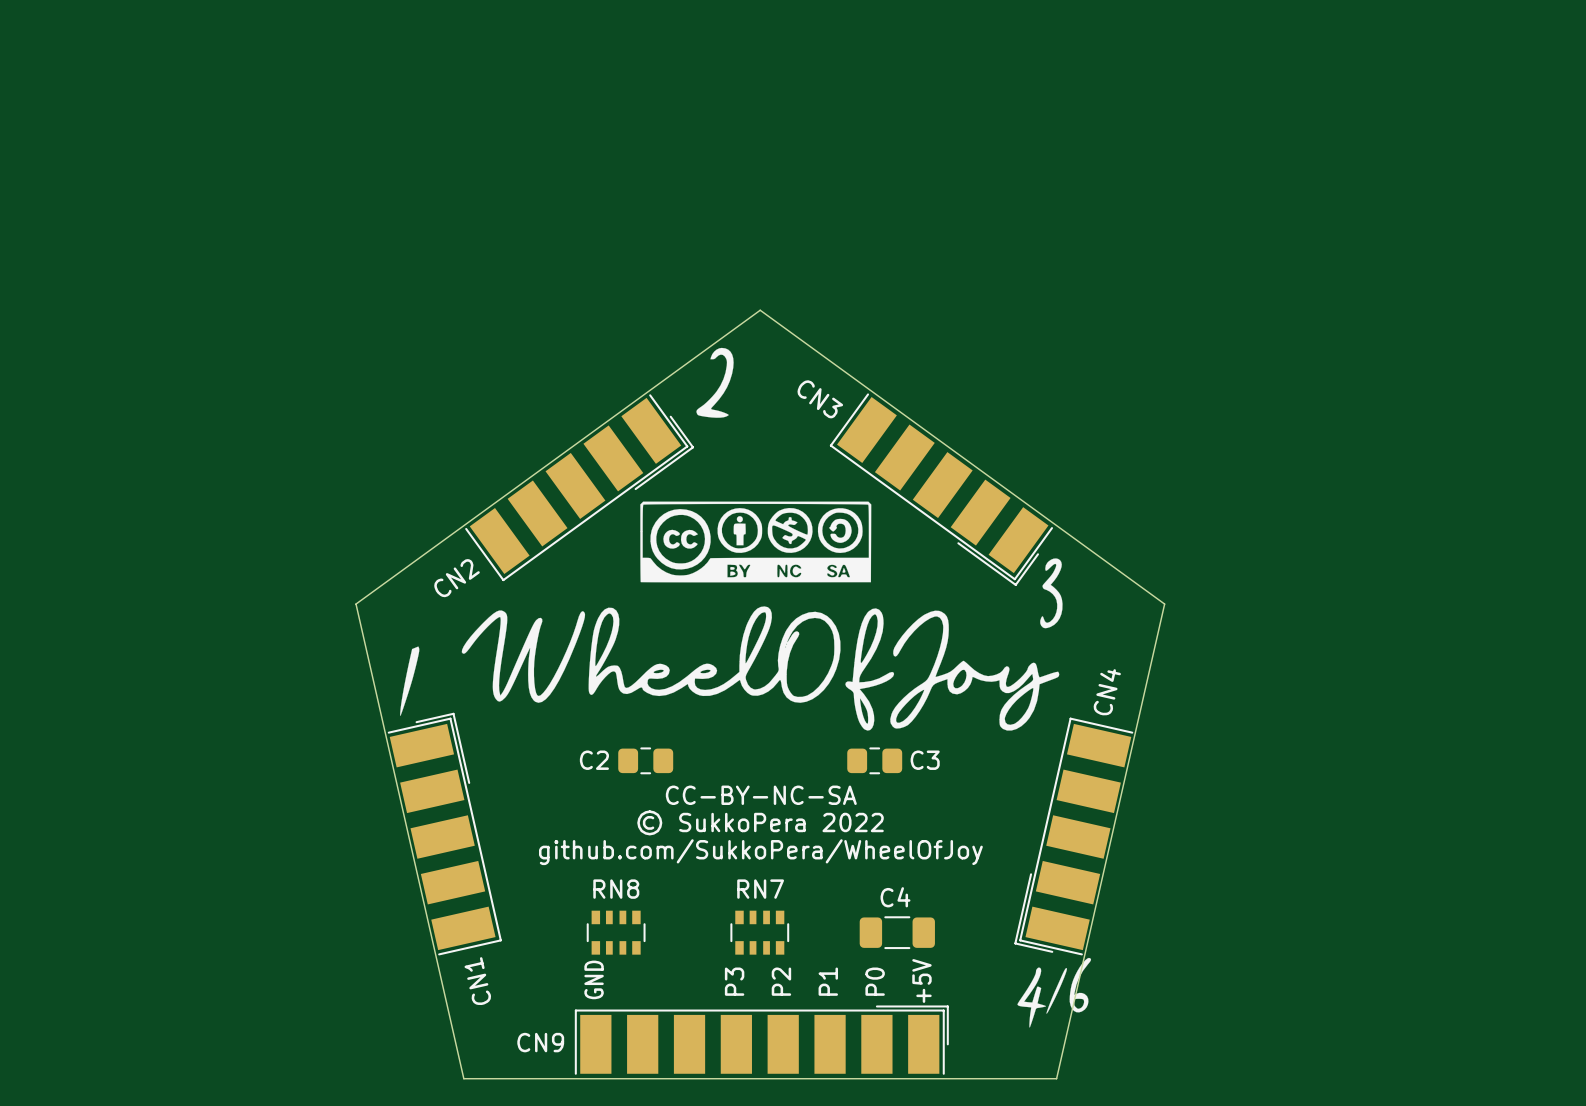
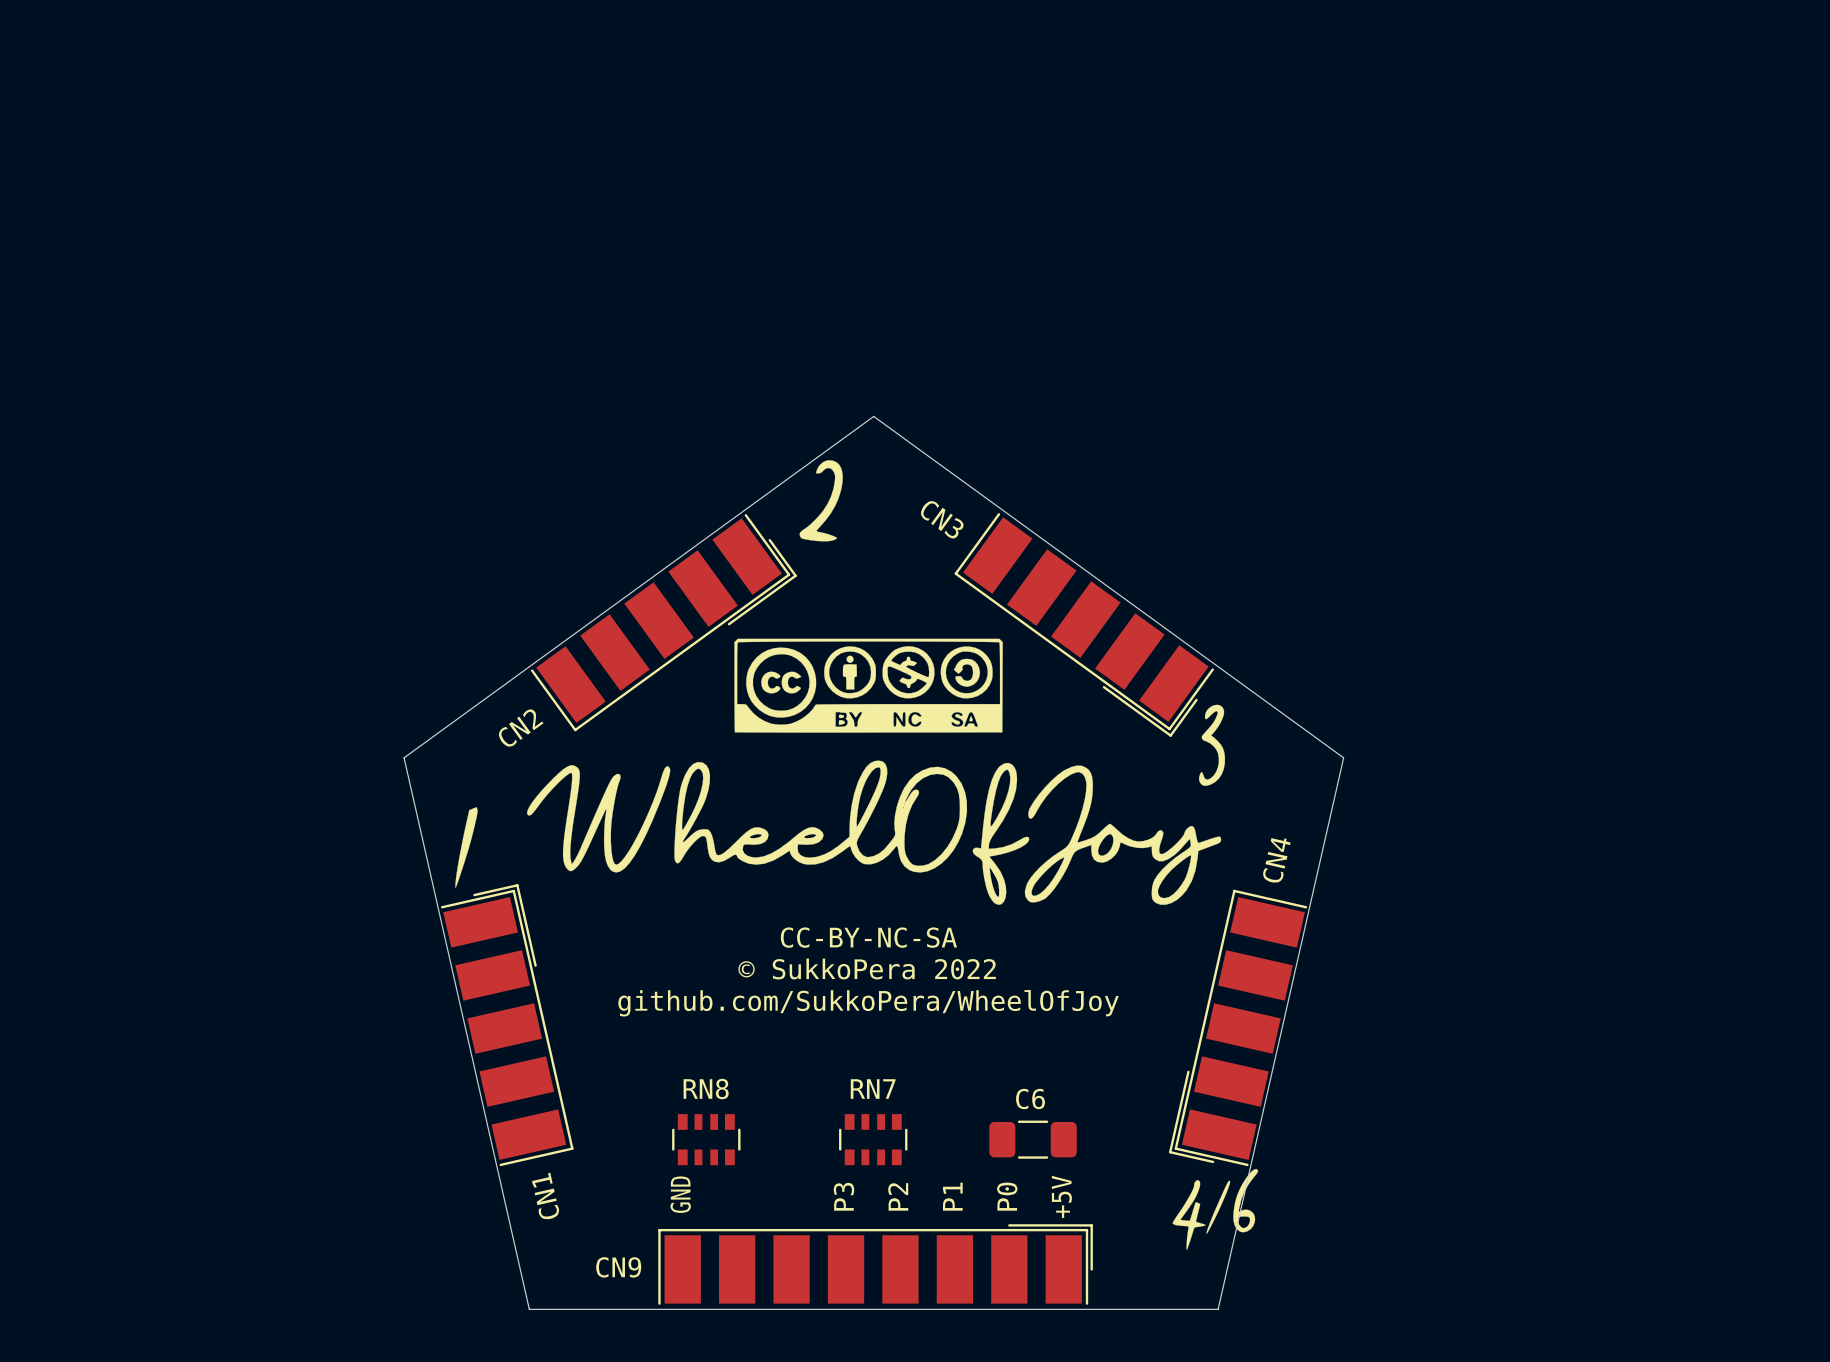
C2: (645, 760) -> none
C3: (874, 760) -> none
text position: CC-BY-NC-SA (761, 795) -> CC-BY-NC-SA (868, 937)
text position: © SukkoPera 2022 (760, 822) -> © SukkoPera 2022 (867, 969)
text position: github.com/SukkoPera/WheelOfJoy (760, 852) -> github.com/SukkoPera/WheelOfJoy (868, 1003)
C4 name: C4 (895, 897) -> C6 (1030, 1099)

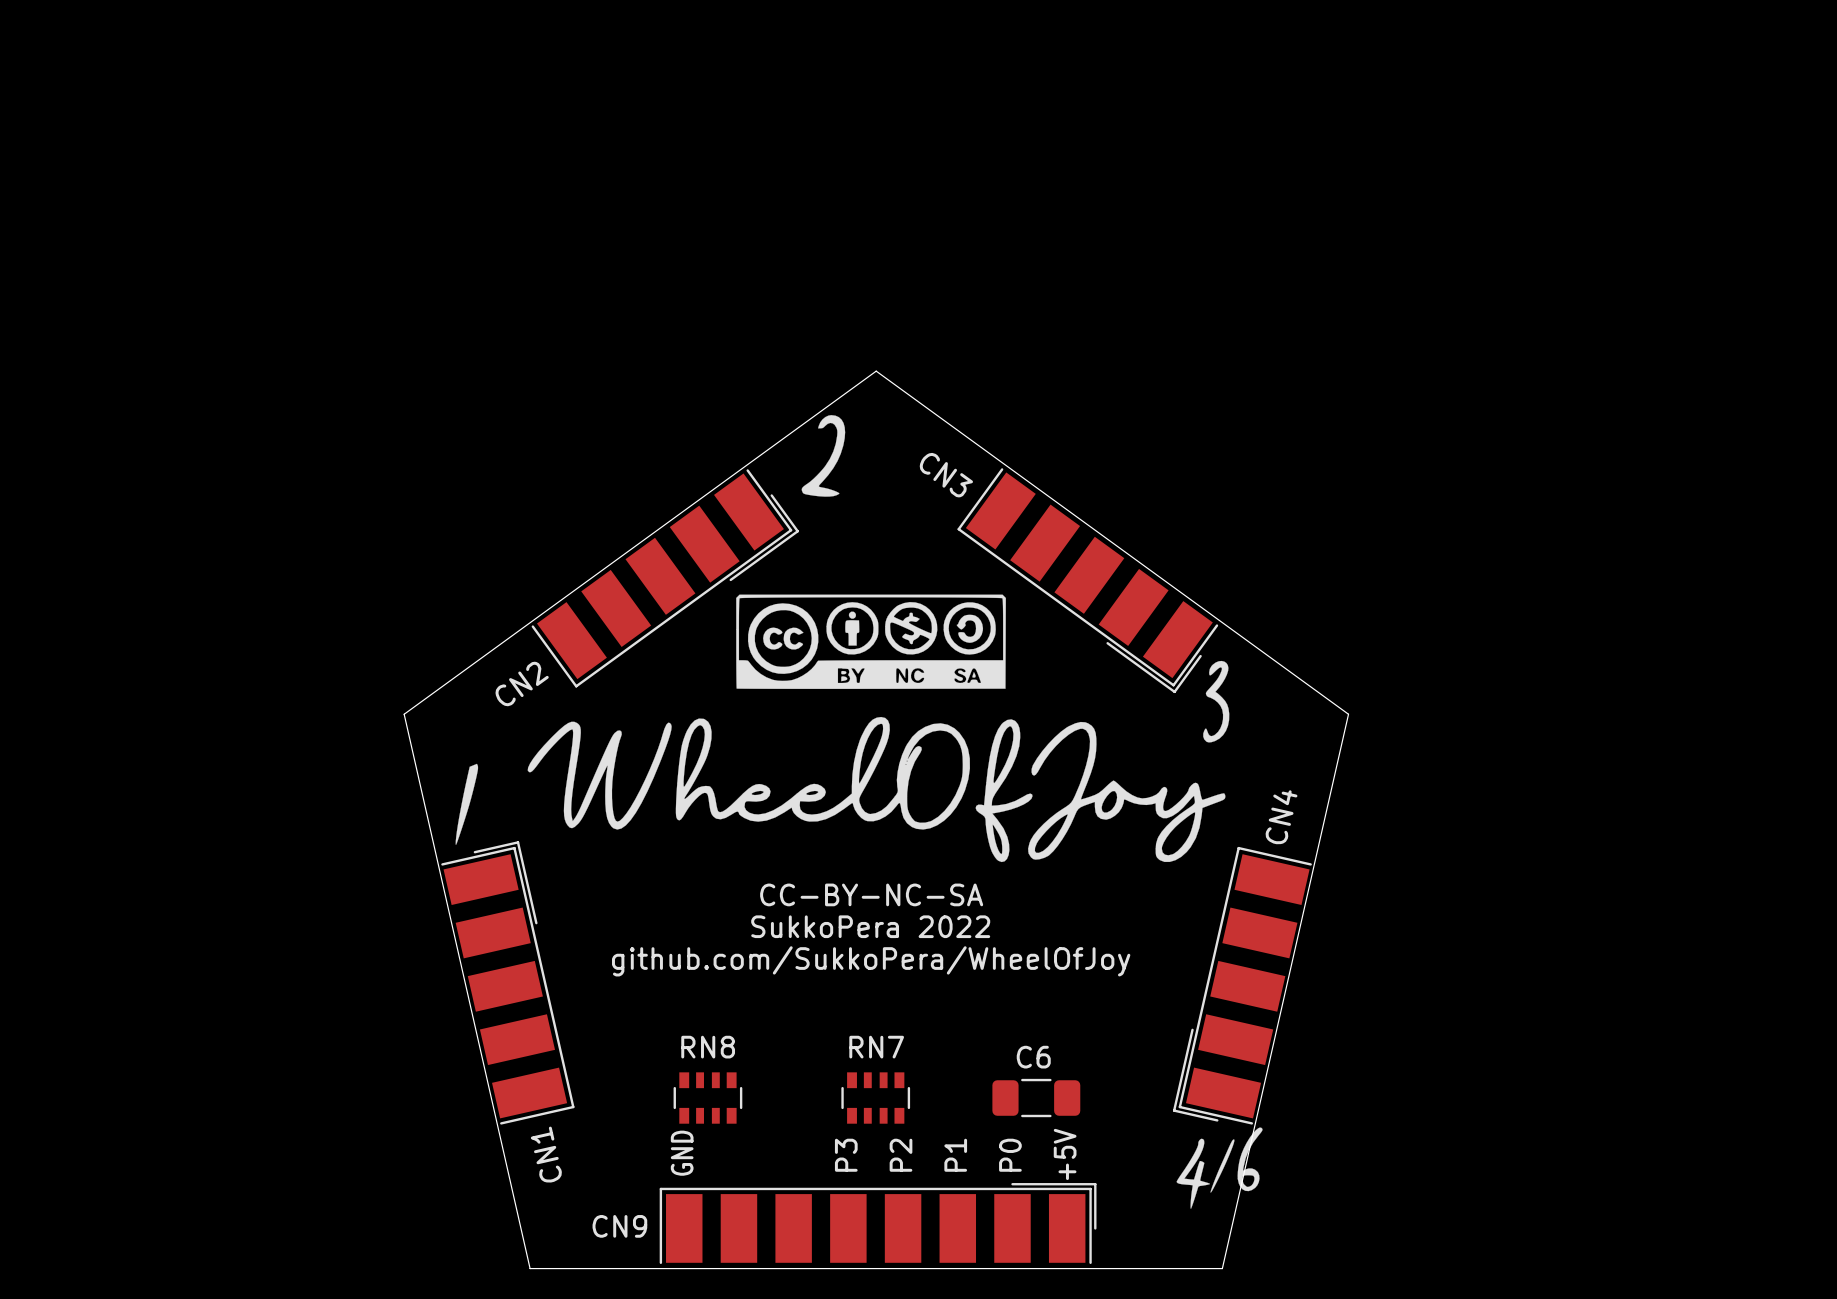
text: © SukkoPera 2022 (867, 969) -> SukkoPera 2022 (870, 926)

